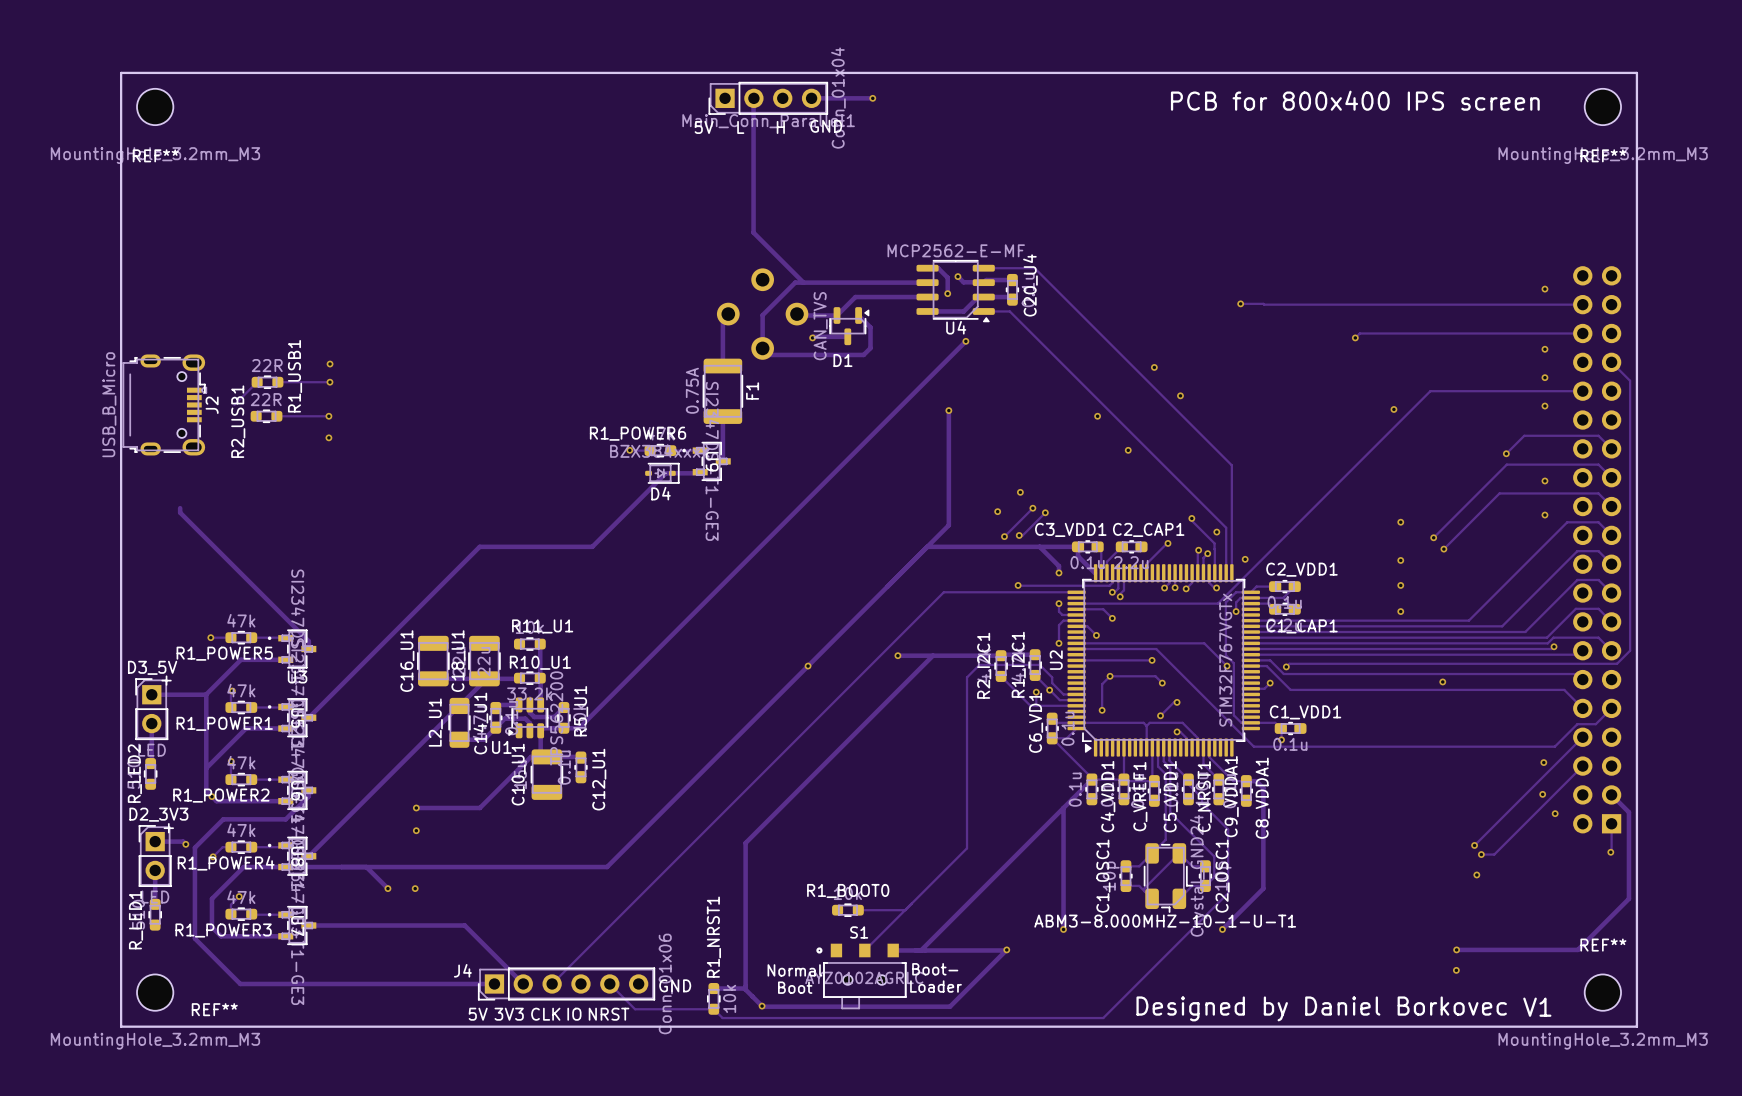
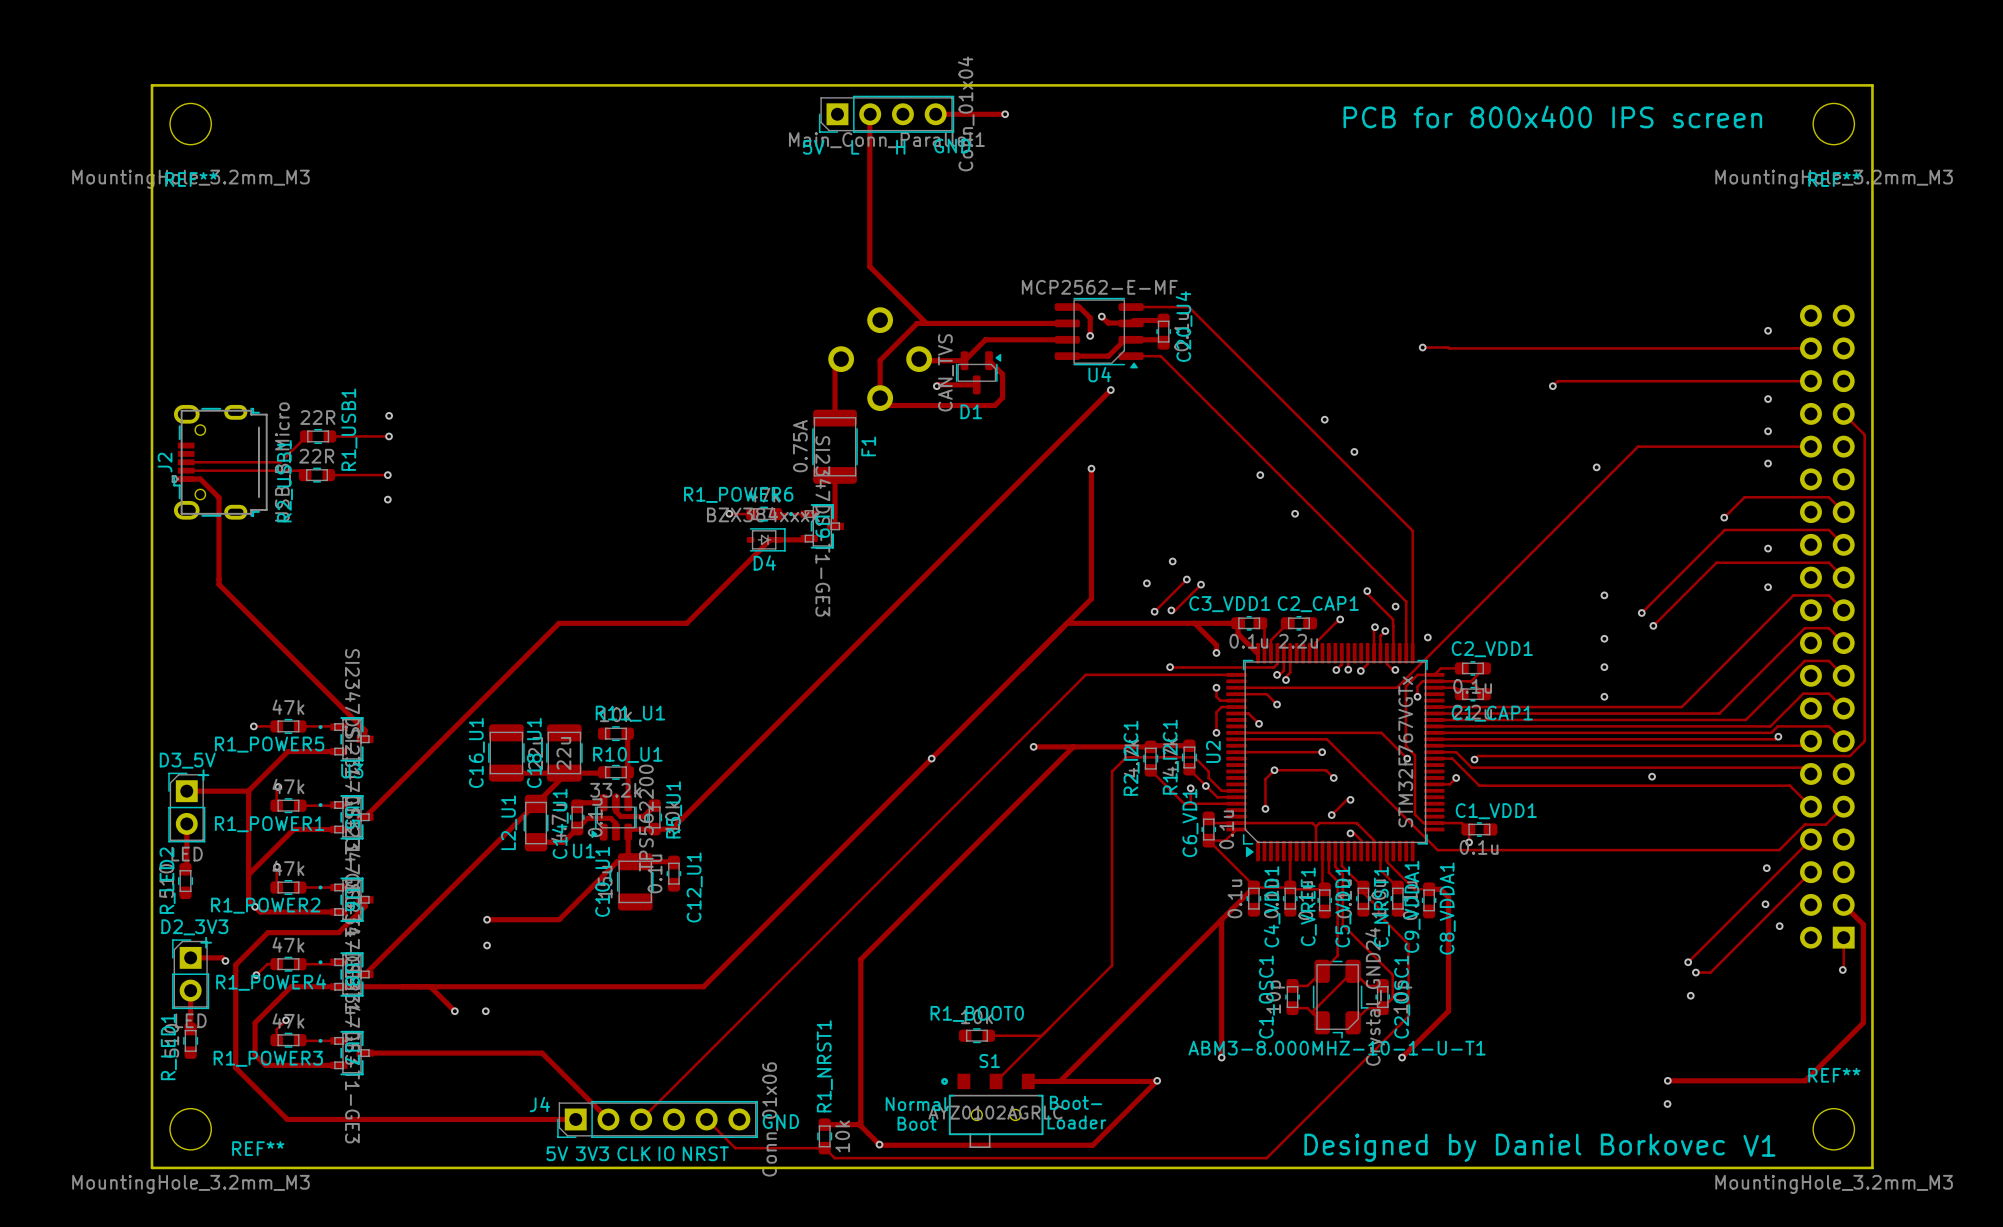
track: none -> (186, 462) (280, 462)
J2 rotation: 0° (164, 404) -> 180° (219, 462)
track: none -> (186, 470) (300, 470)
track: none -> (186, 479) (200, 479) (219, 497) (219, 579)

